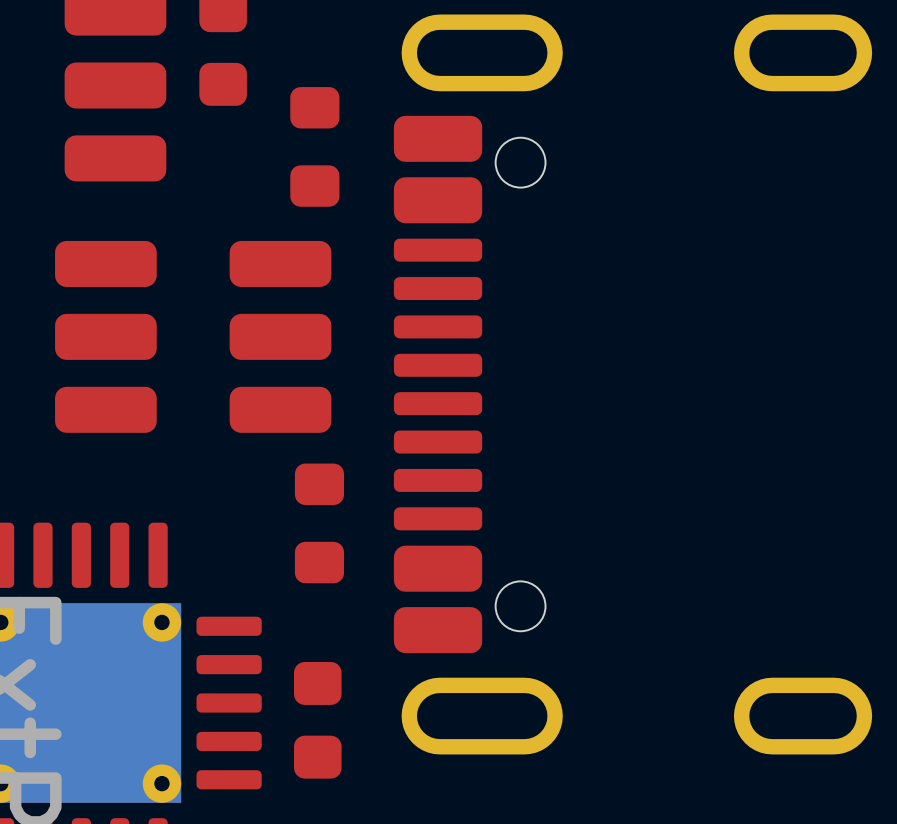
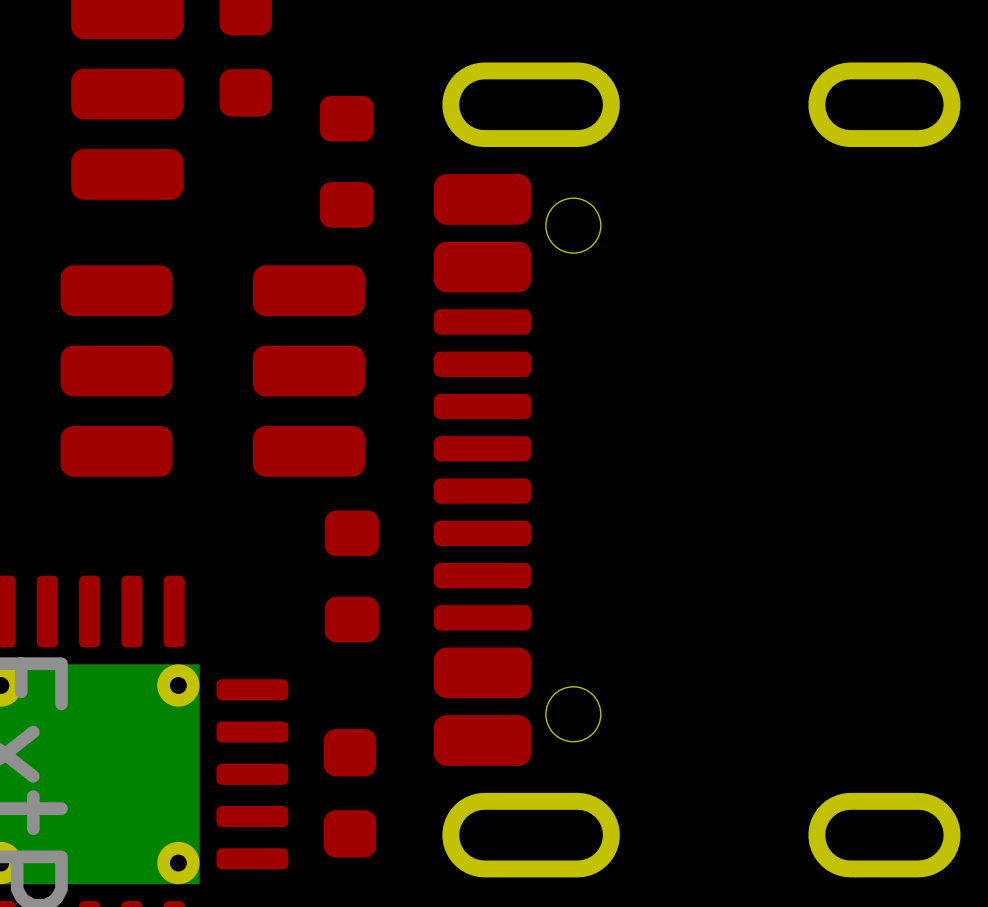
part position: (633, 384) -> (697, 469)

